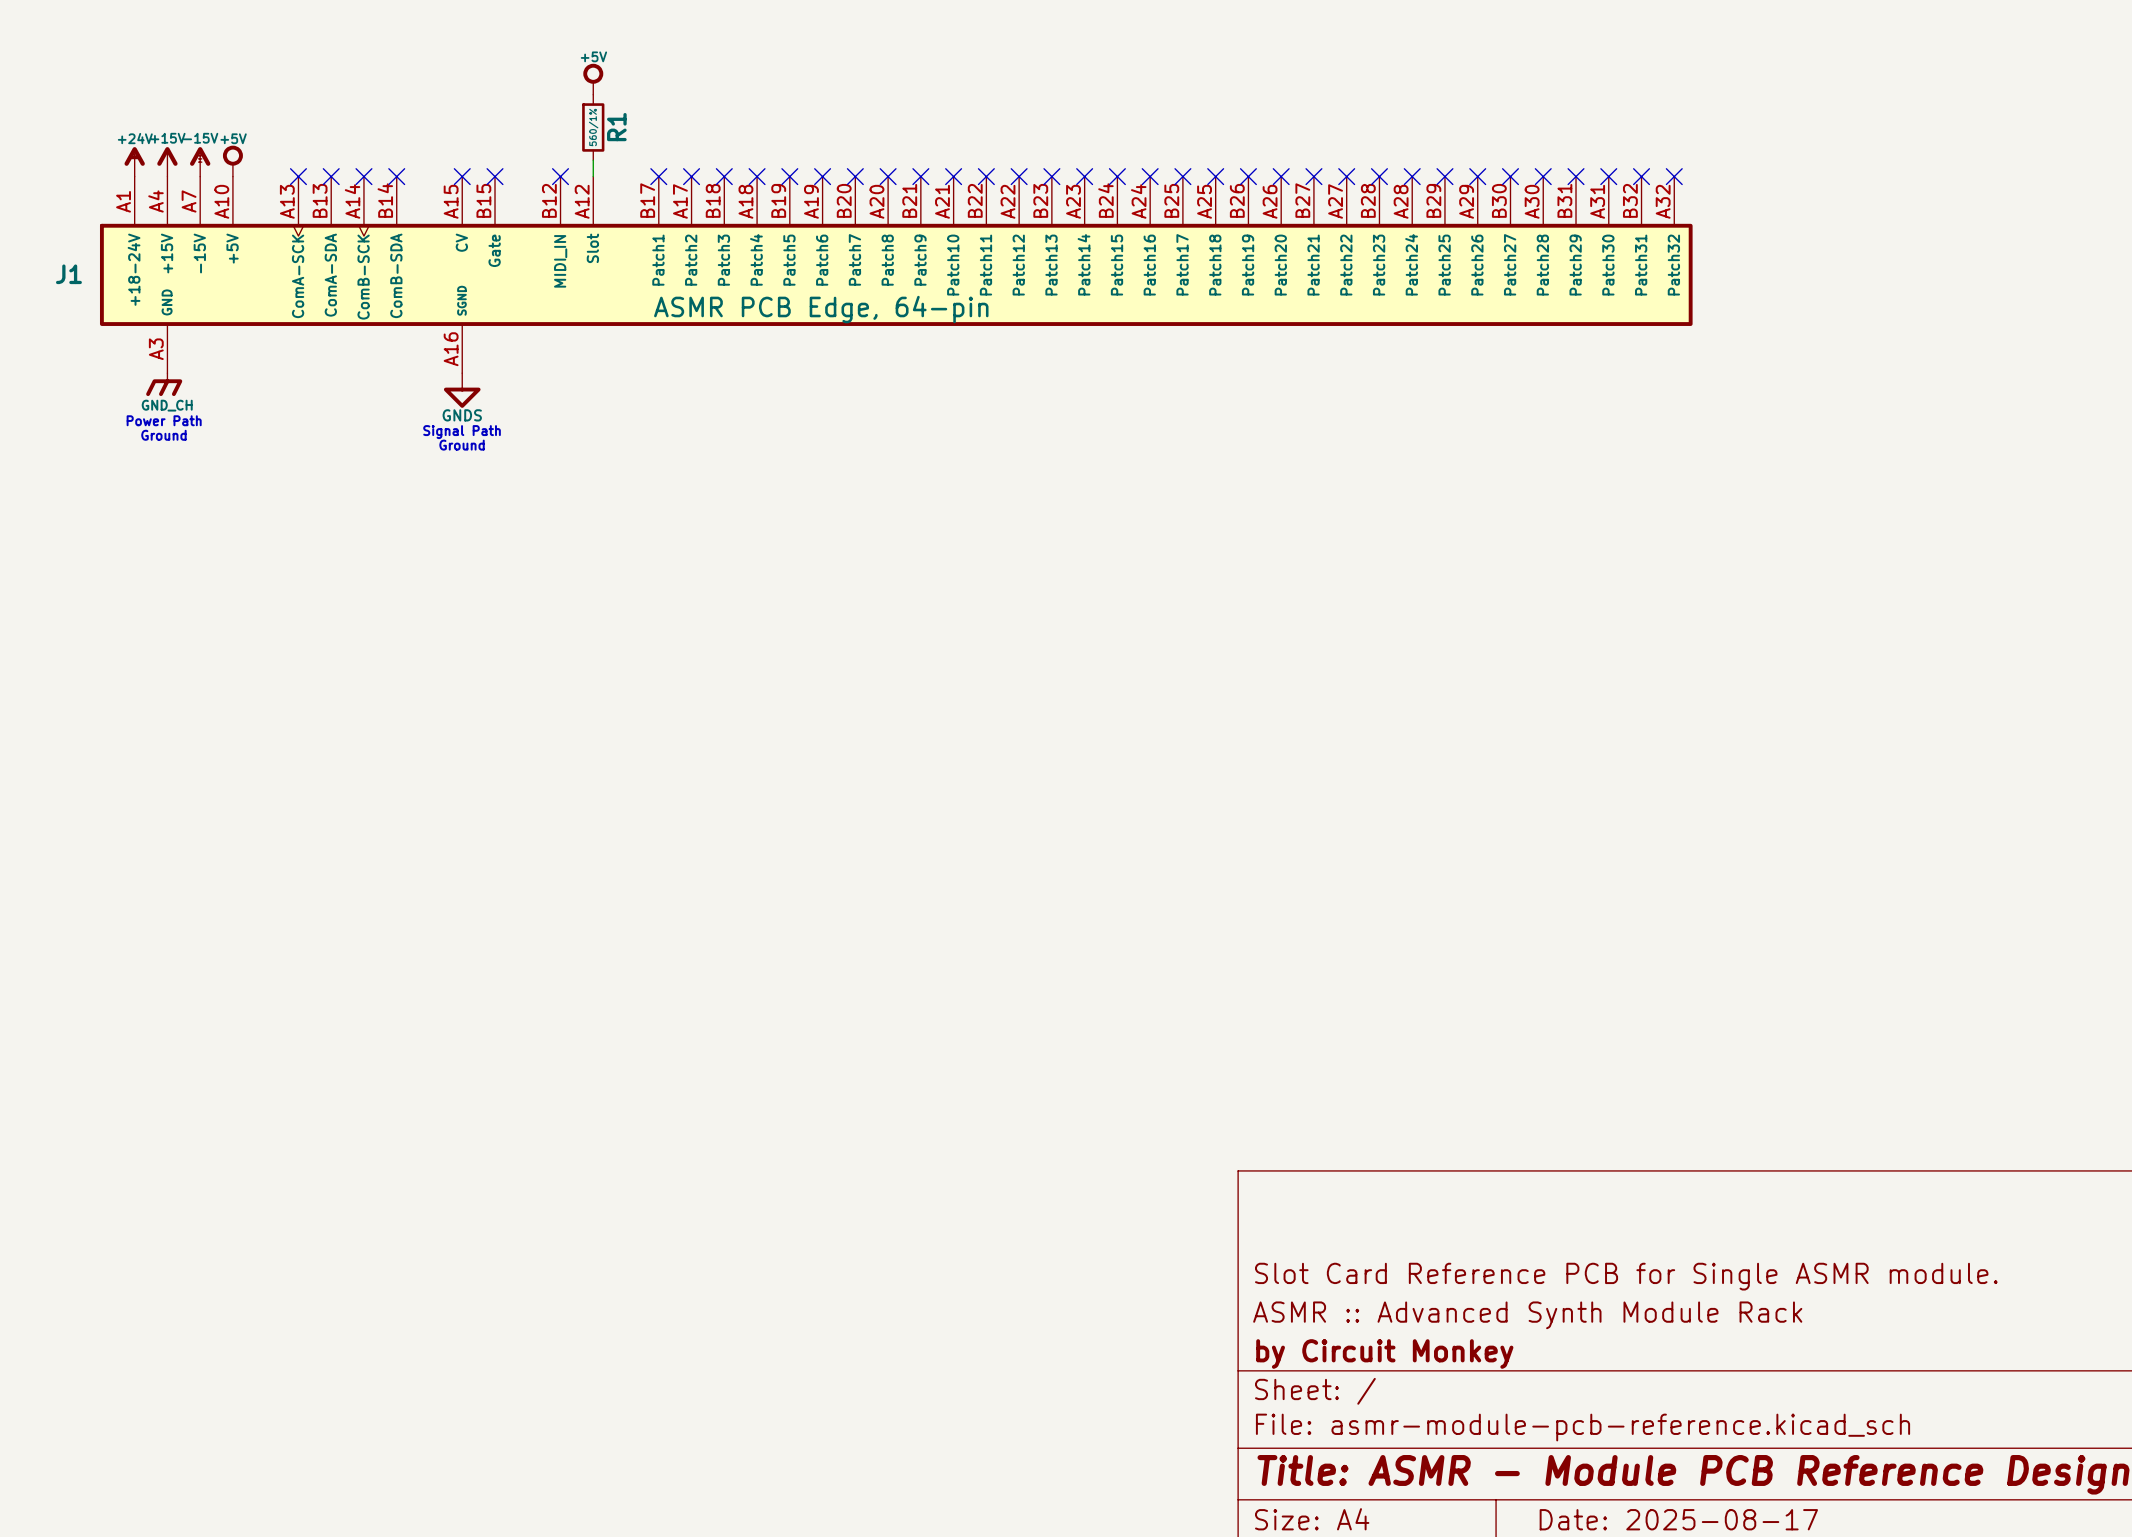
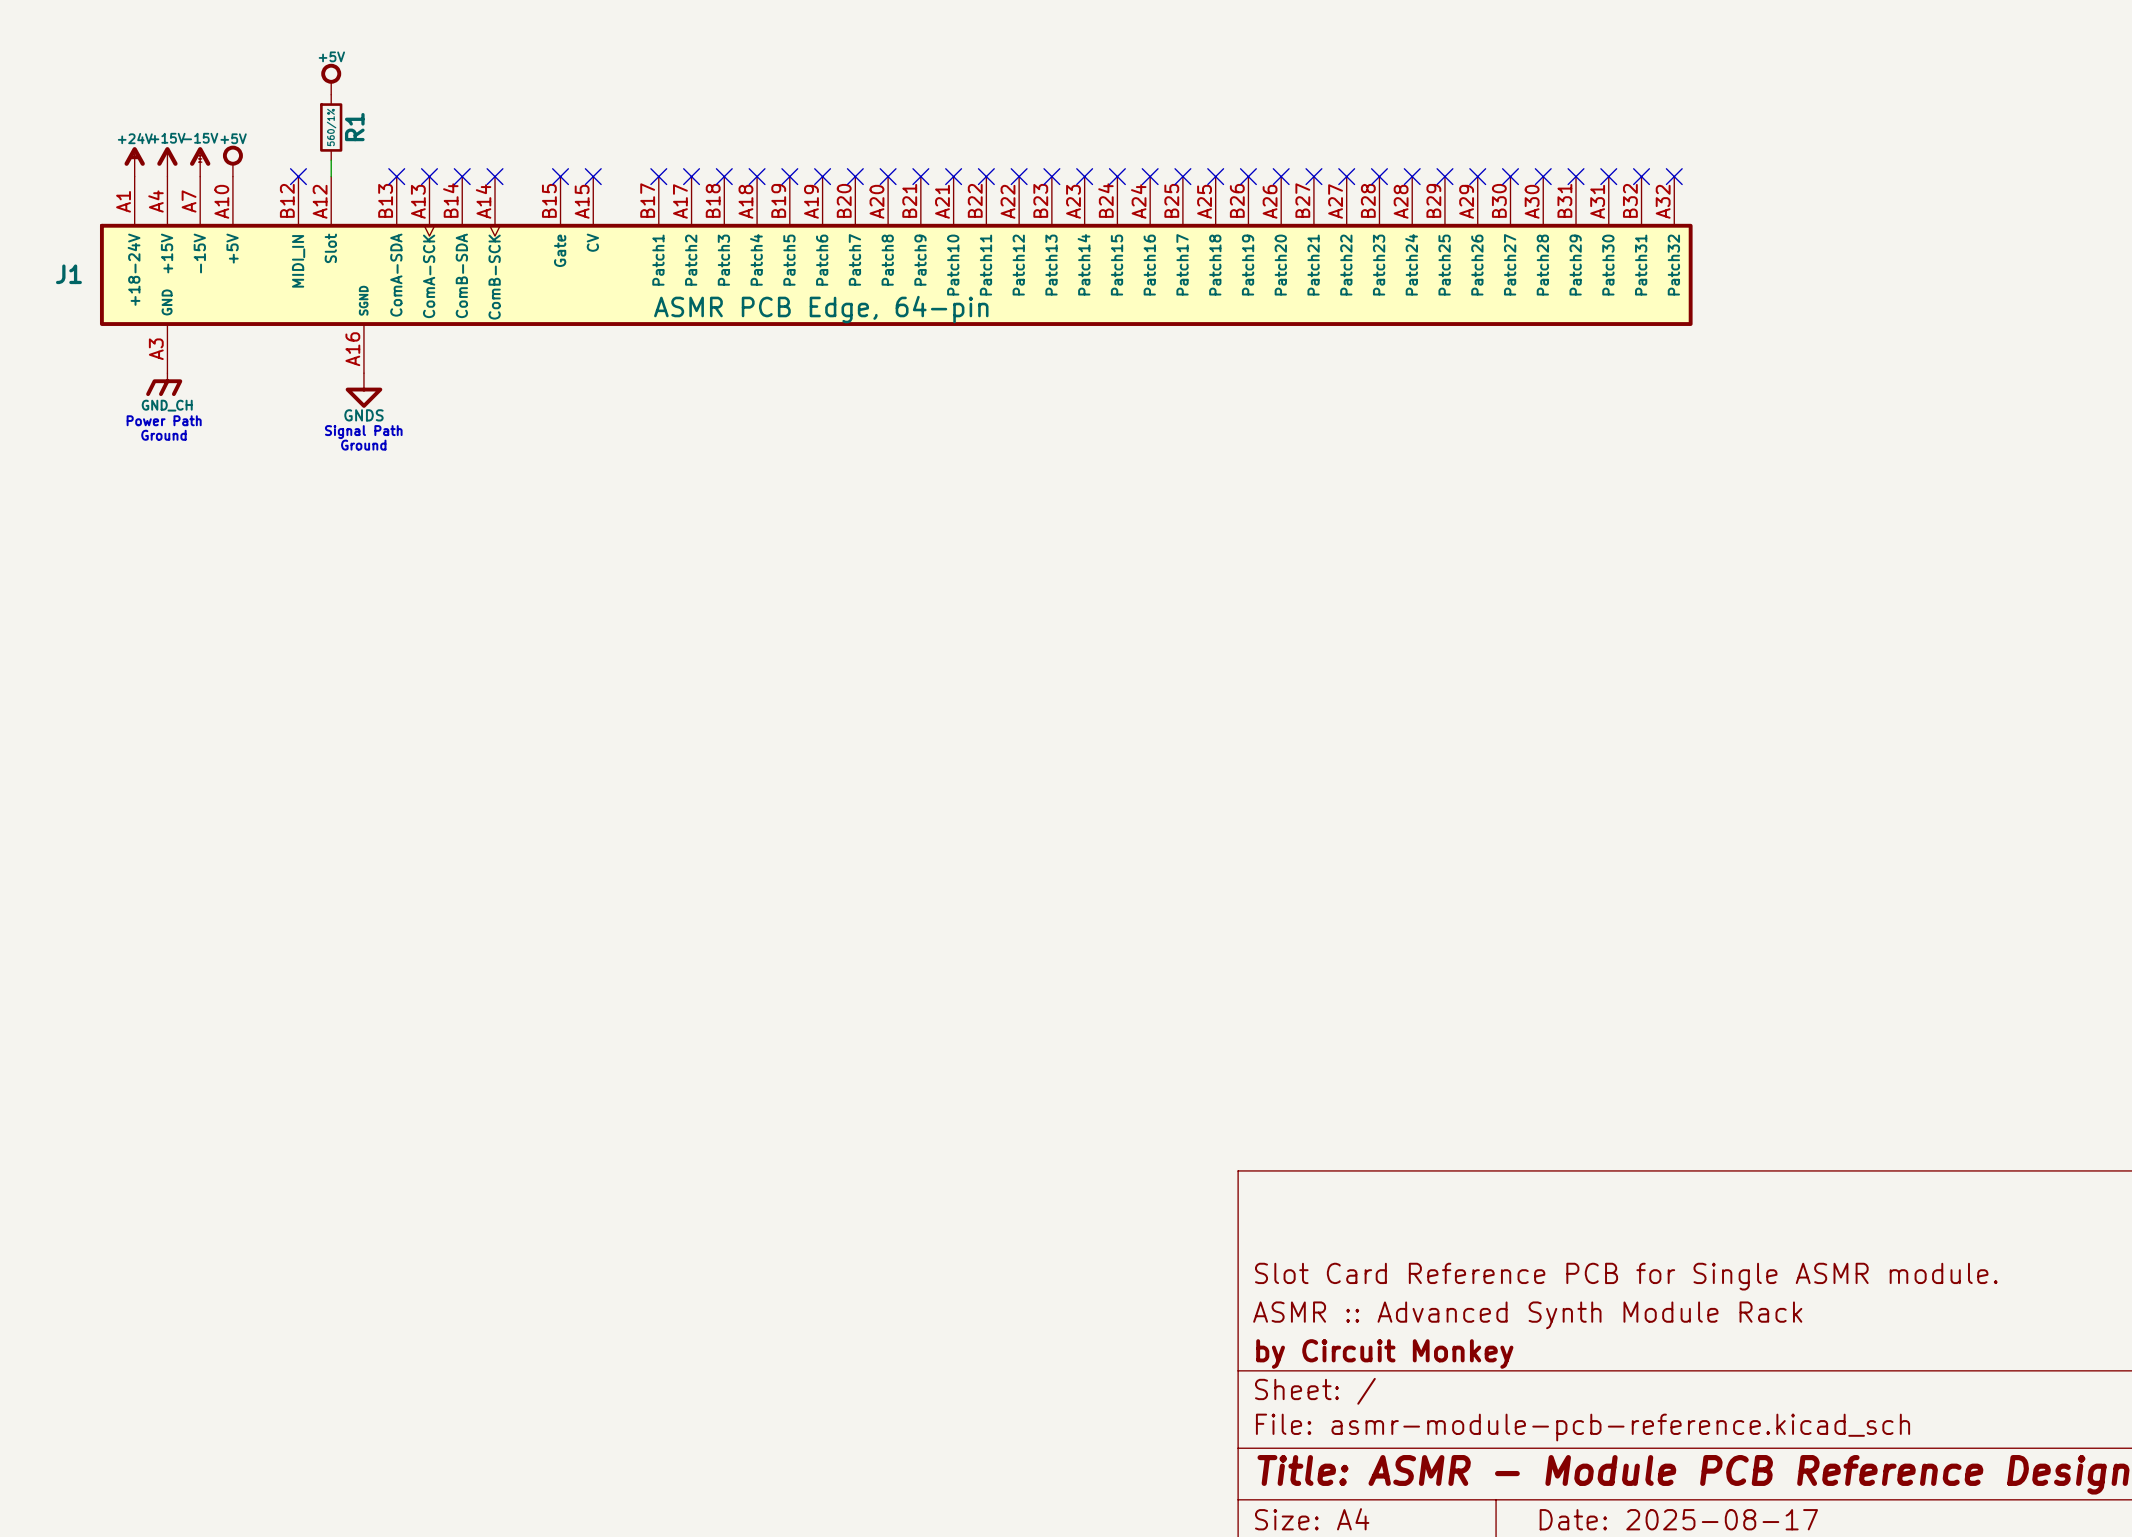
power symbol position: +5V (593, 79) -> +5V (331, 79)
R1 position: (593, 127) -> (331, 127)
wire: (593, 160) (593, 176) -> (331, 160) (331, 176)
J1 symbol: [99, 176, 1693, 374] -> [99, 176, 1693, 374]
no-connect mark: (331, 176) -> none
no-connect mark: (363, 176) -> none
no-connect mark: none -> (429, 176)
no-connect mark: none -> (593, 176)
power symbol position: GNDS (462, 390) -> GNDS (363, 390)
text position: Signal Path (462, 432) -> Signal Path (363, 432)
text position: Ground (462, 445) -> Ground (363, 445)

